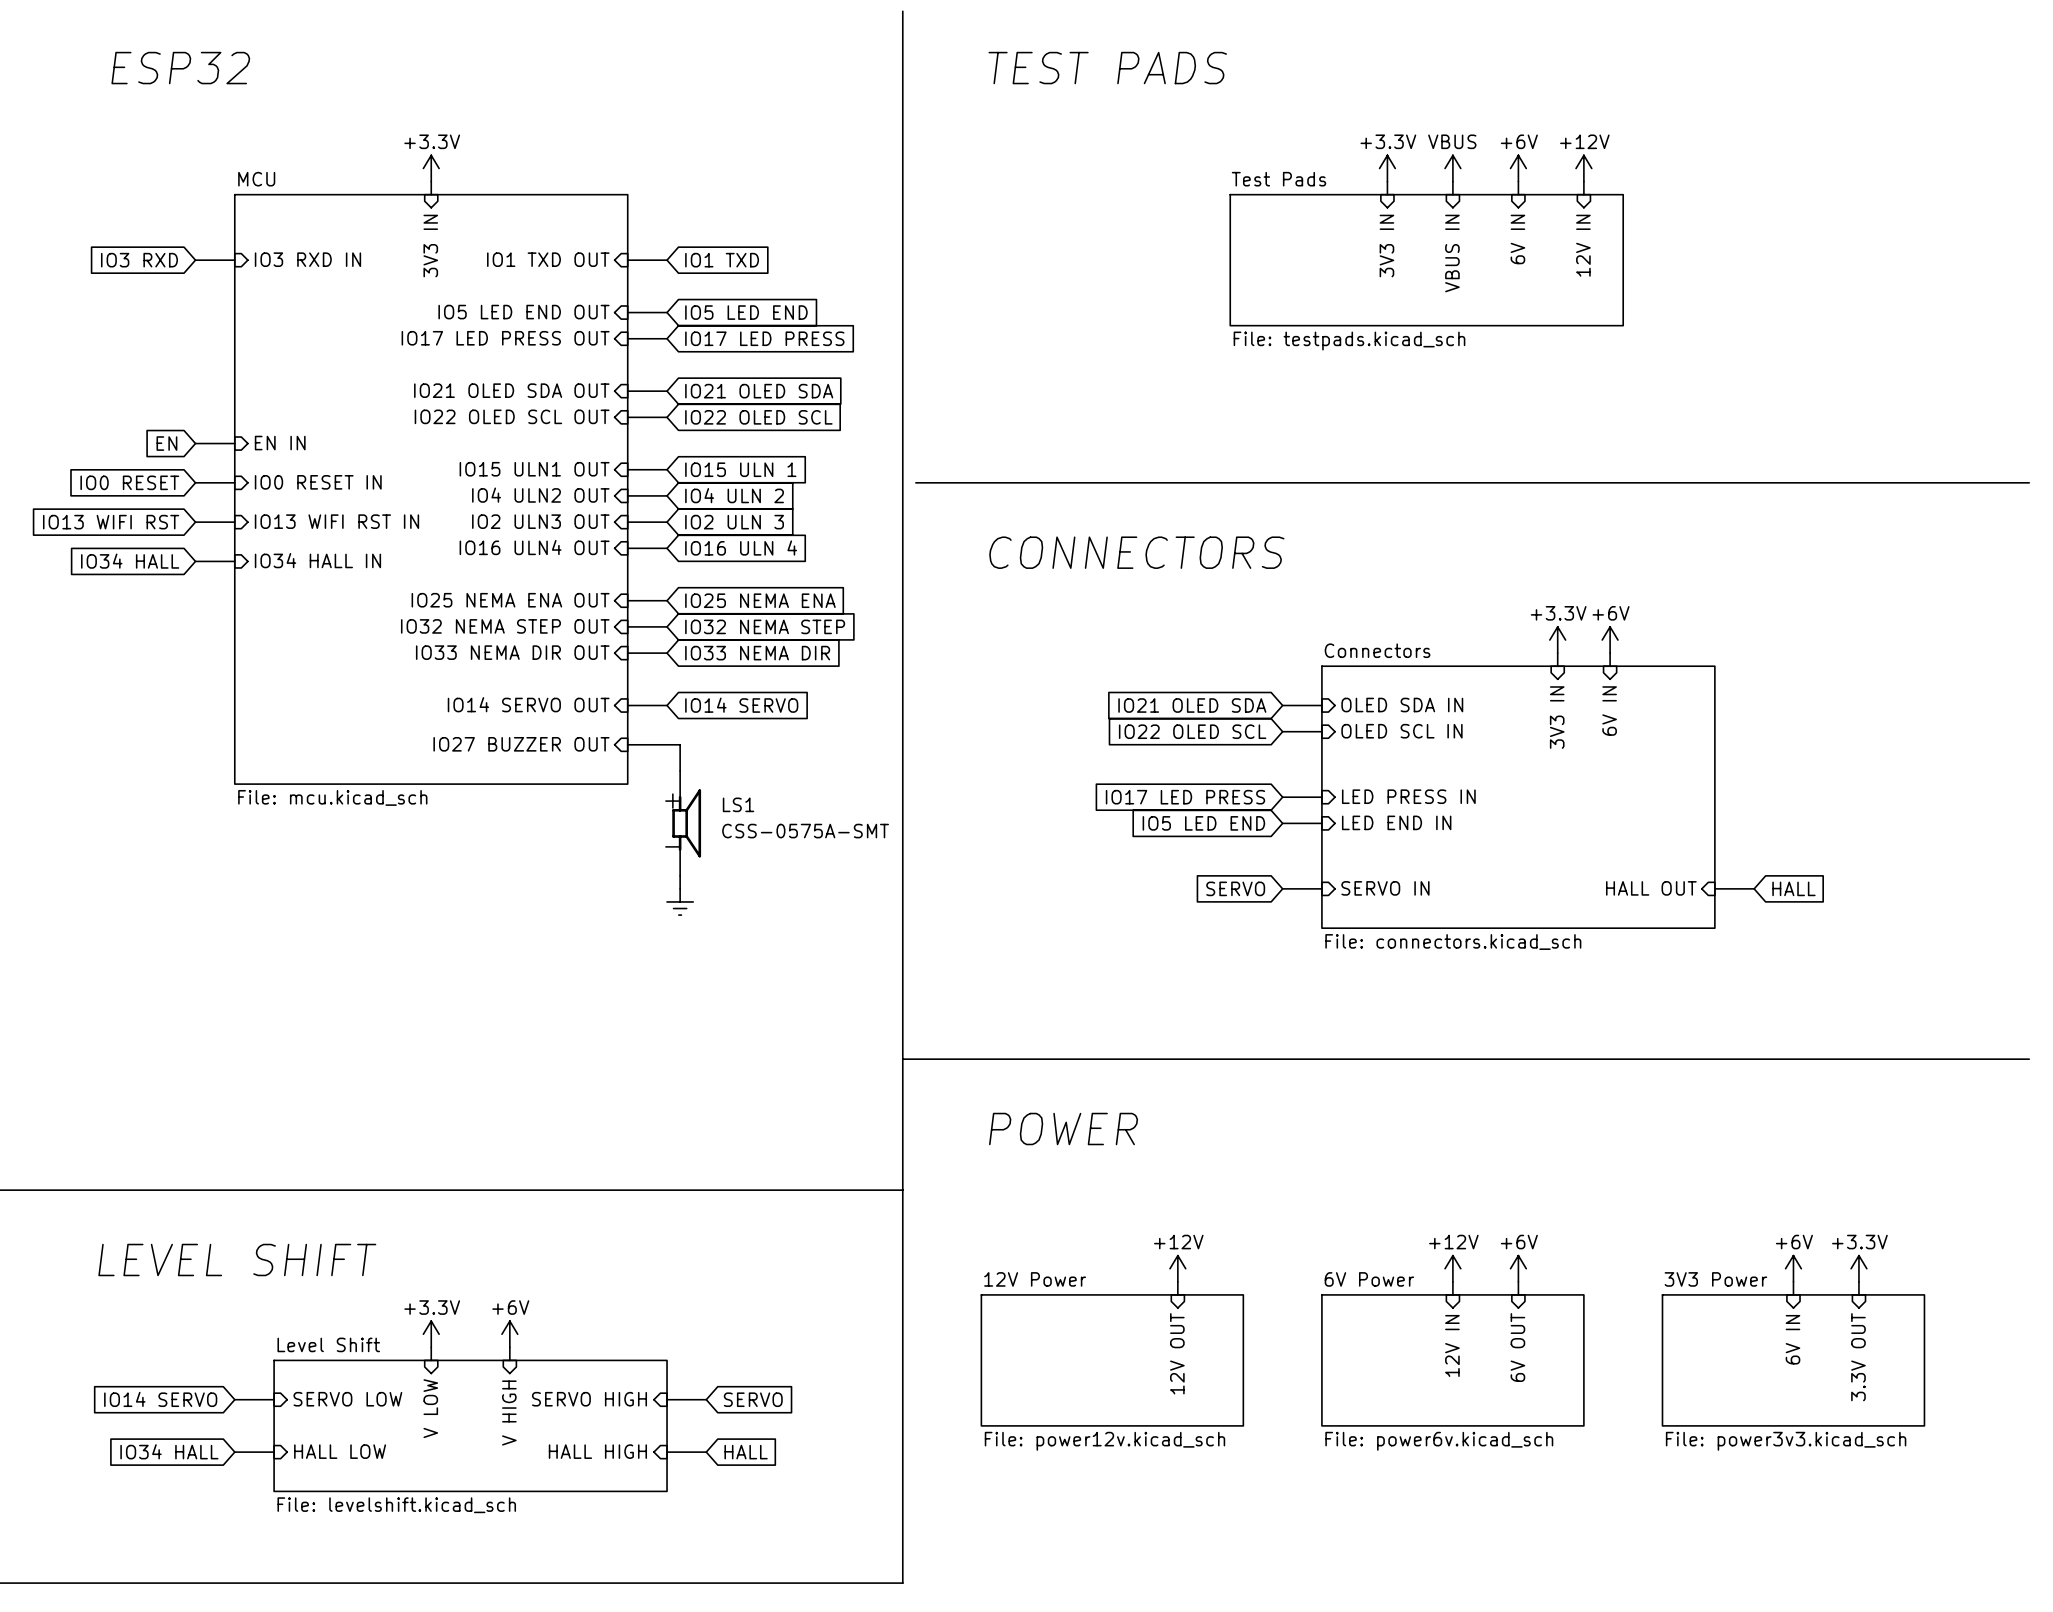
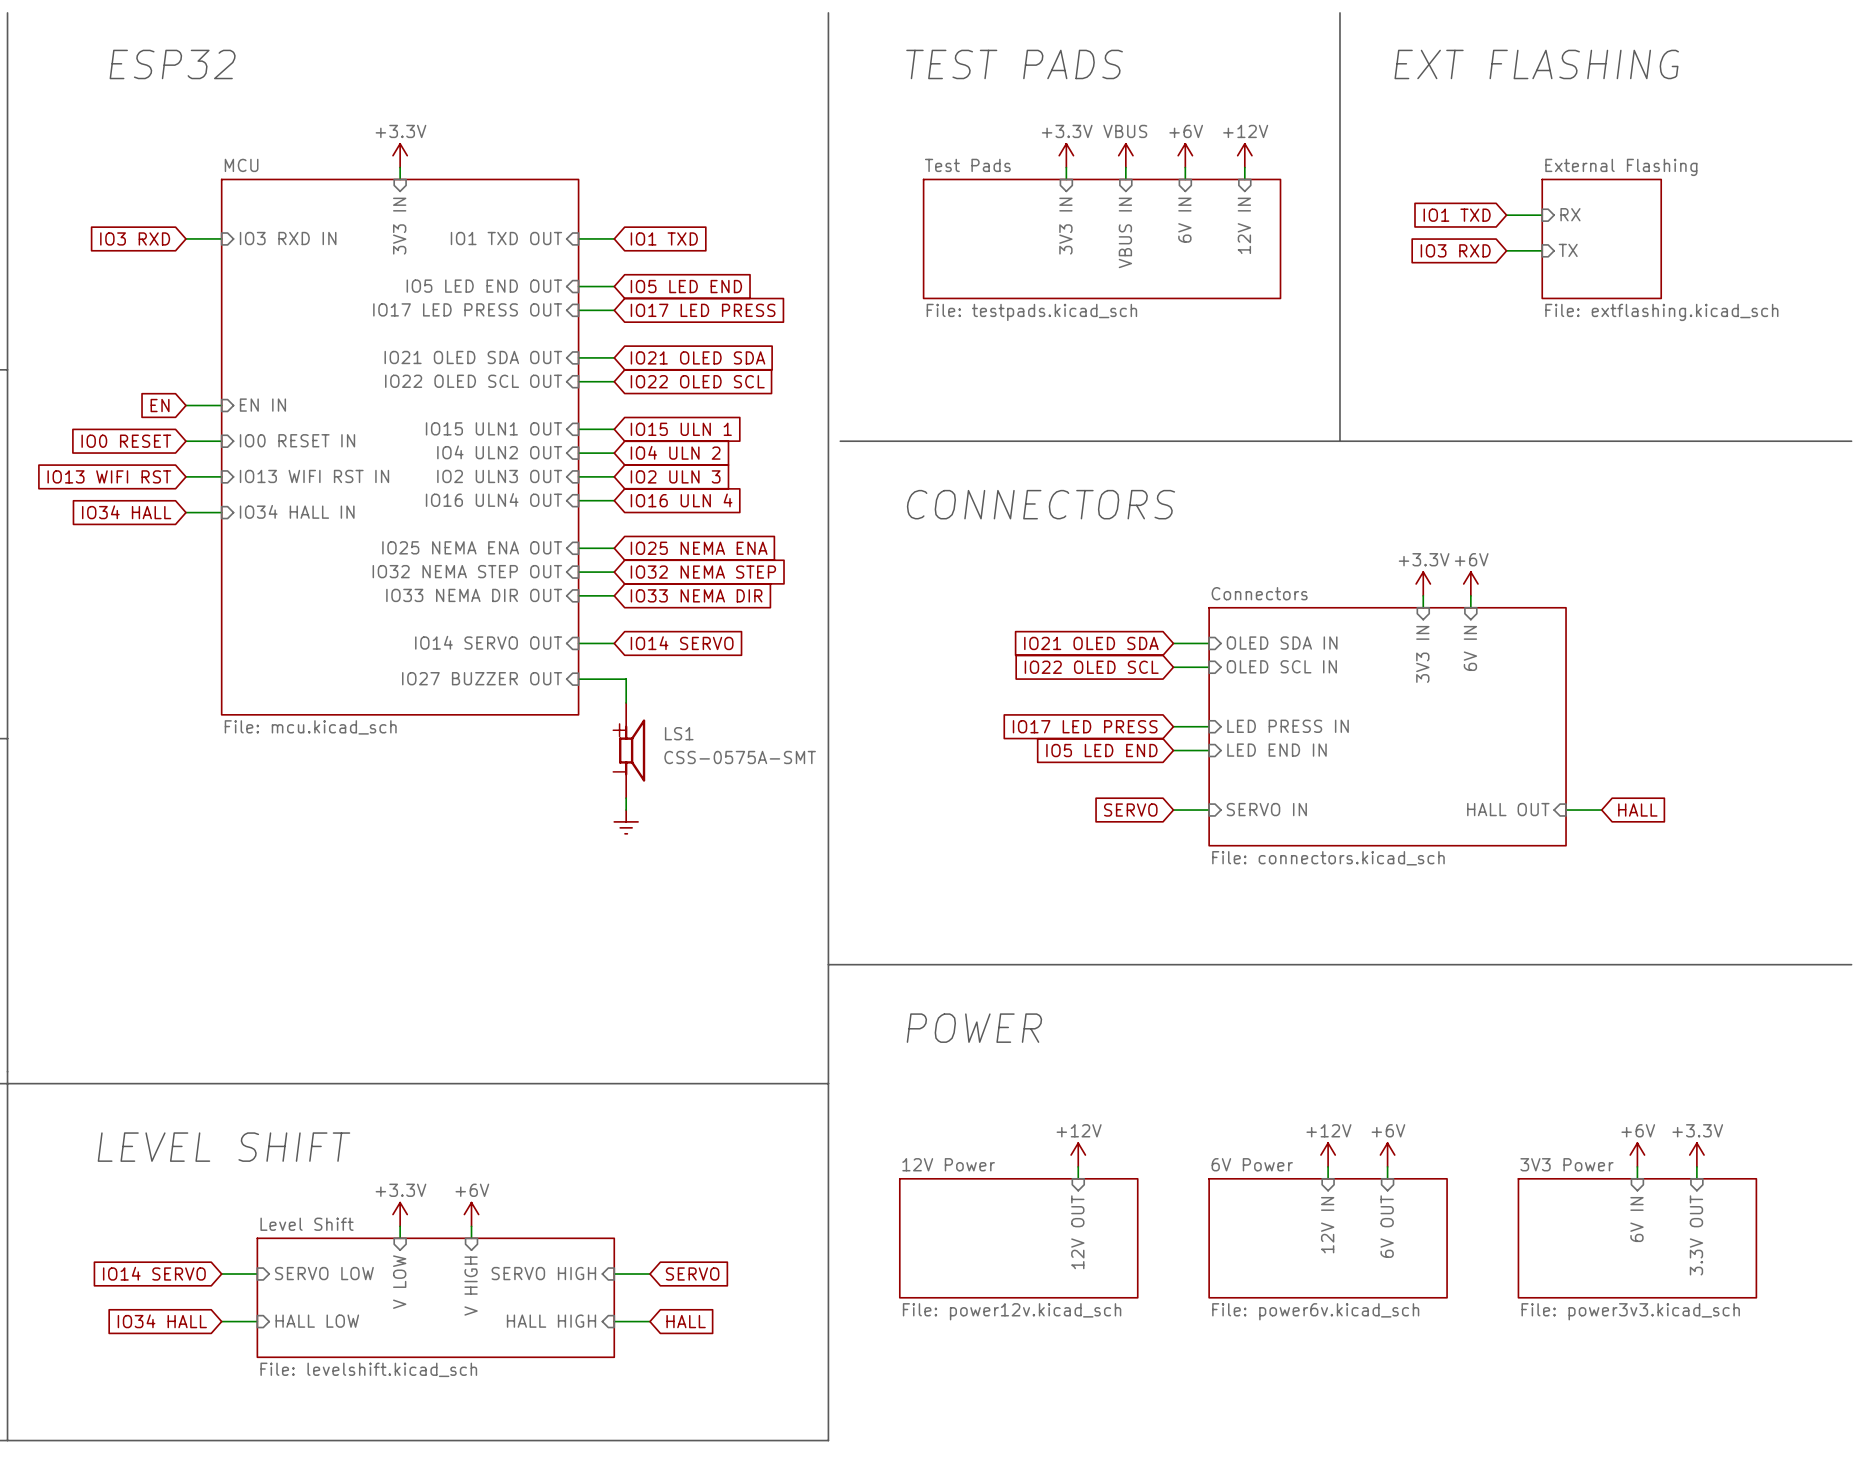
line: none -> (1339, 12) (1339, 441)
text: none -> EXT FLASHING (1536, 64)
power symbol position: +3.3V (1387, 168) -> +3.3V (1066, 155)
power symbol position: VBUS (1452, 168) -> VBUS (1125, 155)
power symbol position: +6V (1518, 168) -> +6V (1185, 155)
power symbol position: +12V (1583, 168) -> +12V (1244, 155)
wire: (1387, 181) (1387, 194) -> (1066, 167) (1066, 179)
wire: (1452, 181) (1452, 194) -> (1125, 167) (1125, 179)
wire: (1518, 181) (1518, 194) -> (1185, 167) (1185, 179)
wire: (1583, 181) (1583, 194) -> (1244, 167) (1244, 179)
global label: none -> IO1 TXD (1457, 215)
wire: none -> (1506, 215) (1542, 215)
sheet pin: none -> RX (1570, 214)
sheet pin position: 6V IN (1517, 239) -> 6V IN (1184, 220)
sheet pin position: 12V IN (1583, 245) -> 12V IN (1244, 225)
sheet pin position: 3V3 IN (1386, 246) -> 3V3 IN (1065, 226)
sheet pin position: VBUS IN (1452, 253) -> VBUS IN (1125, 232)
sheet Test Pads position: (1426, 260) -> (1102, 238)
sheet External Flashing: none -> File: extflashing.kicad_sch (1601, 238)
sheet pin: none -> TX (1568, 250)
global label: none -> IO3 RXD (1455, 250)
wire: none -> (1506, 250) (1542, 250)

